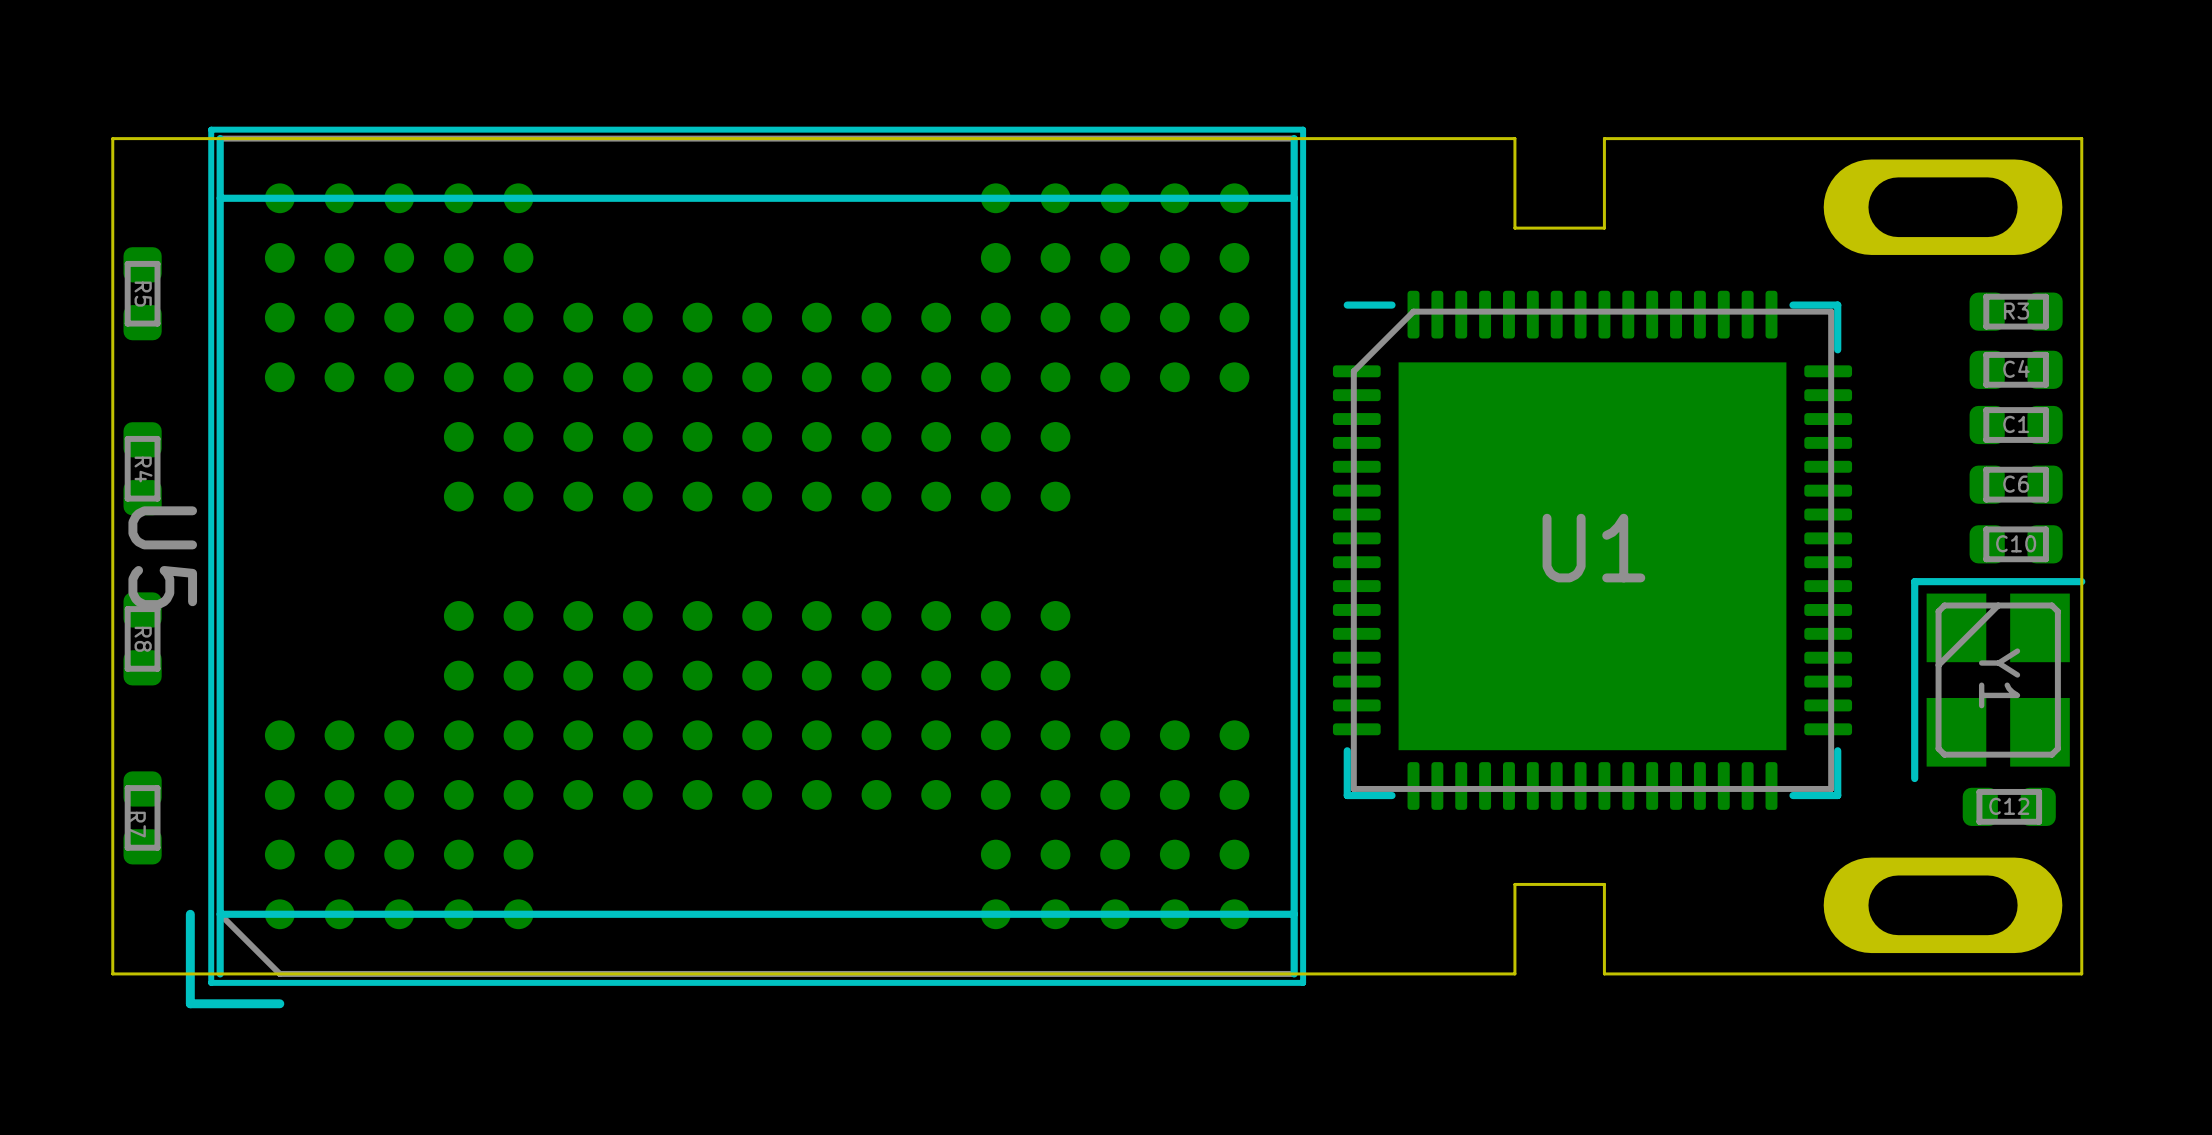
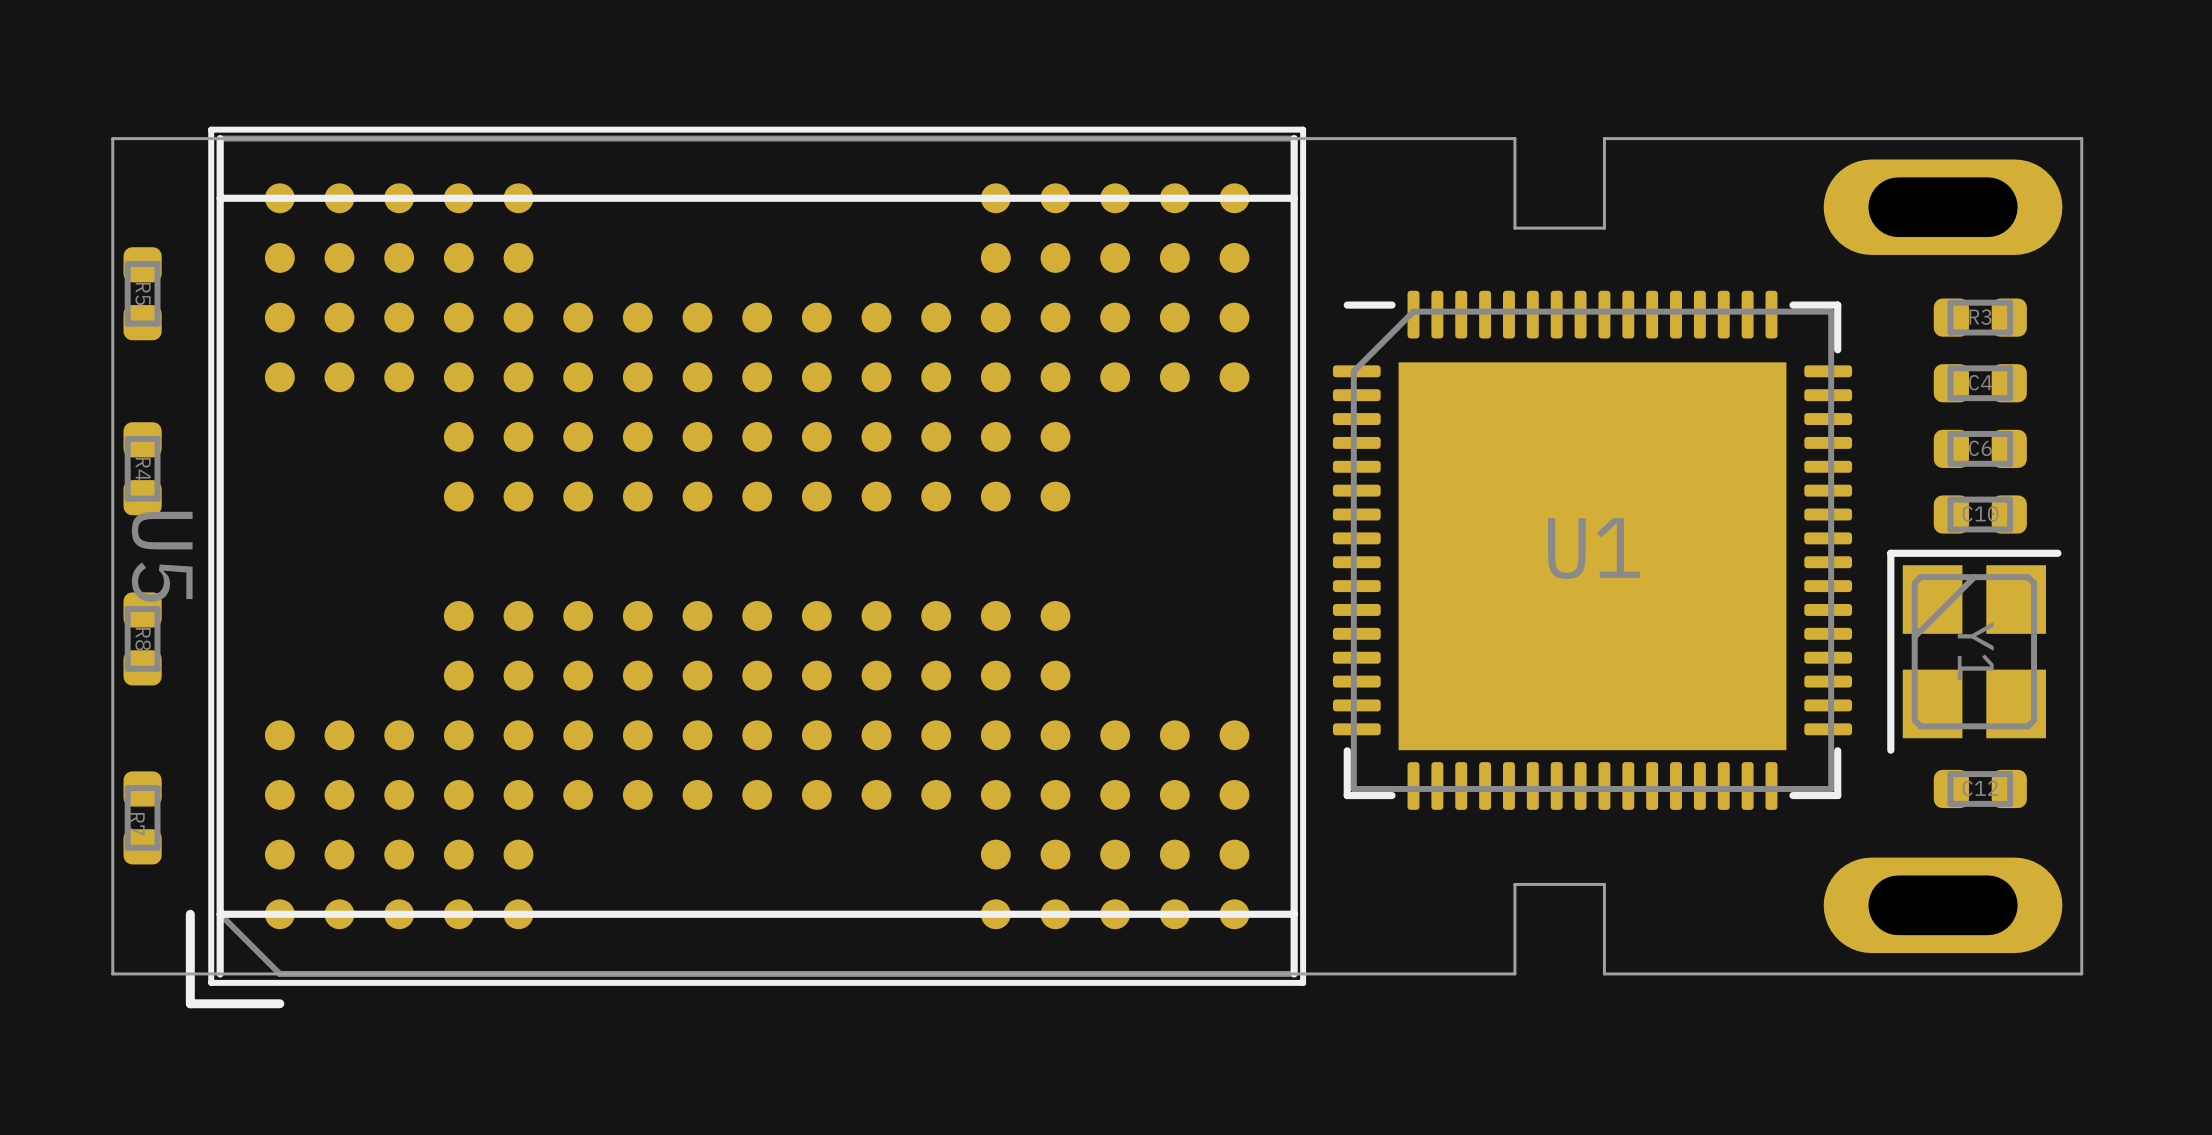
R3 position: (2016, 311) -> (1980, 317)
C4 position: (2016, 369) -> (1980, 383)
C1: (2016, 425) -> none
C6 position: (2016, 484) -> (1980, 448)
C10 position: (2016, 544) -> (1980, 514)
Y1 position: (1998, 680) -> (1974, 651)
C12 position: (2009, 806) -> (1980, 788)

